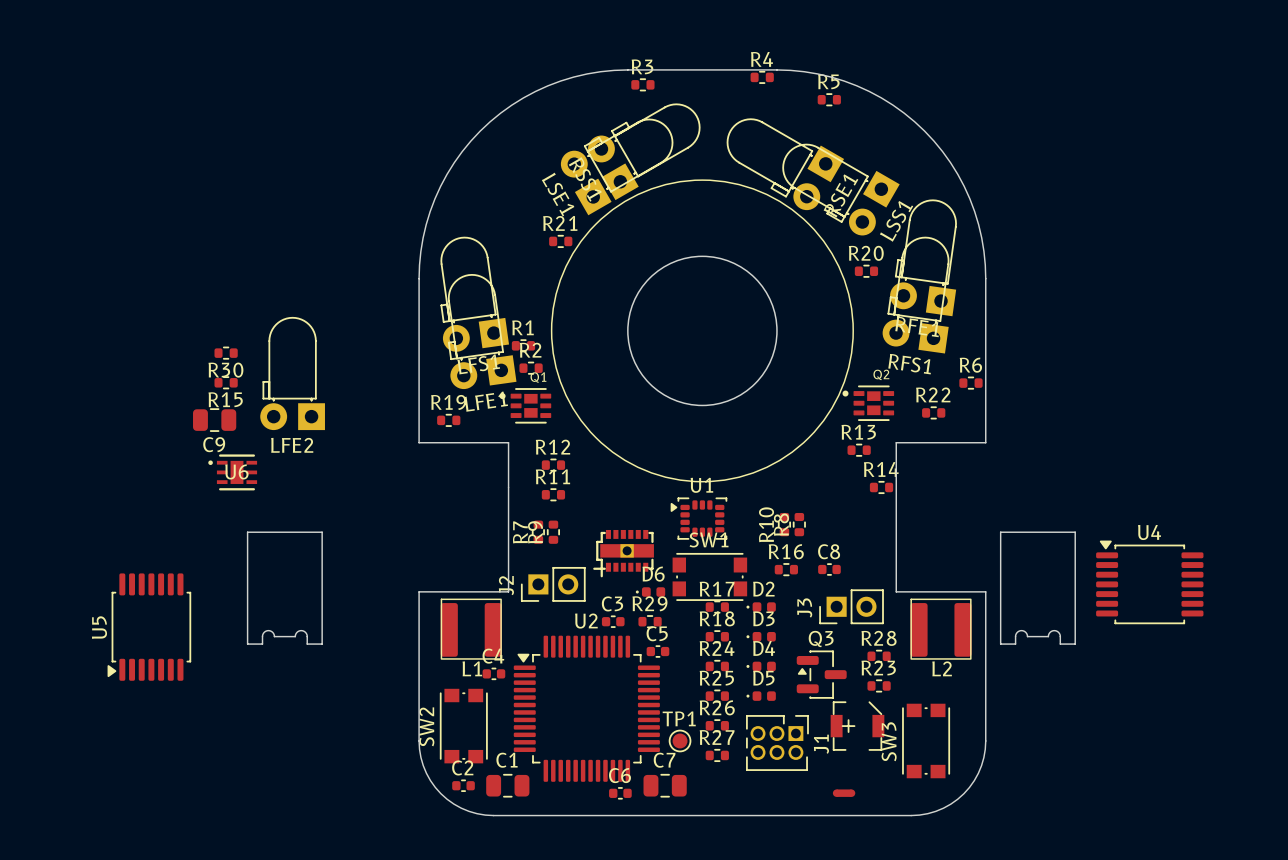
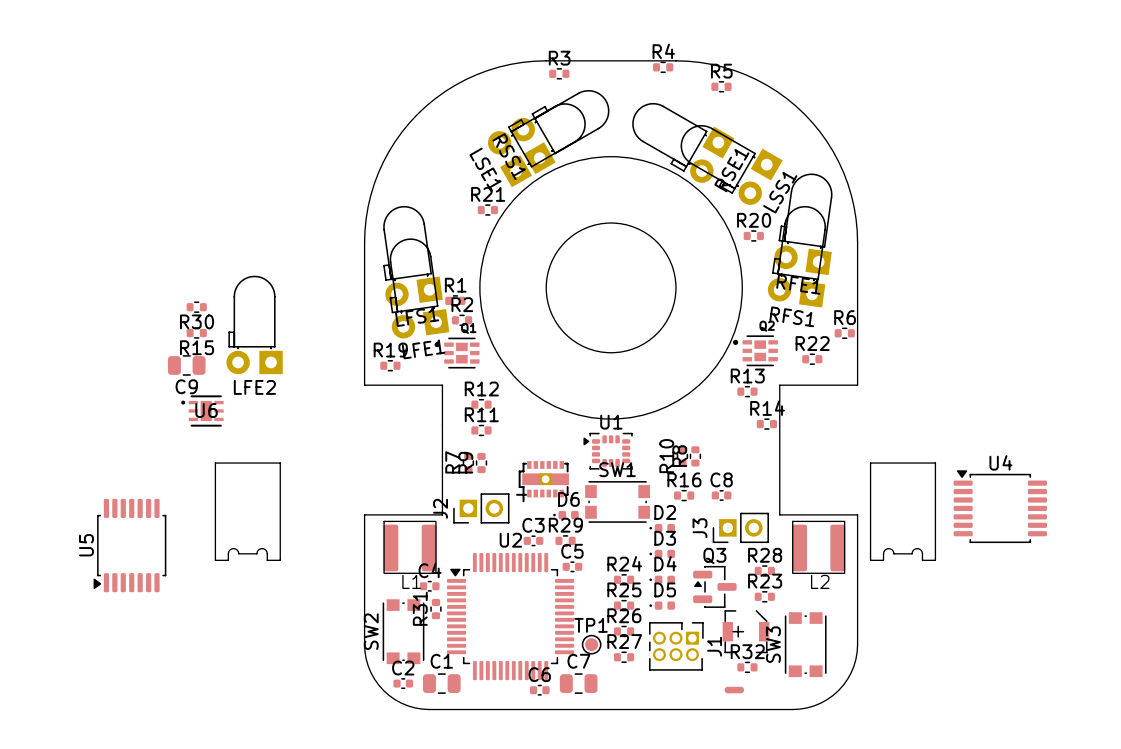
R17: (717, 607) -> none
R18: (717, 636) -> none
R31: none -> (435, 609)
R32: none -> (747, 667)

